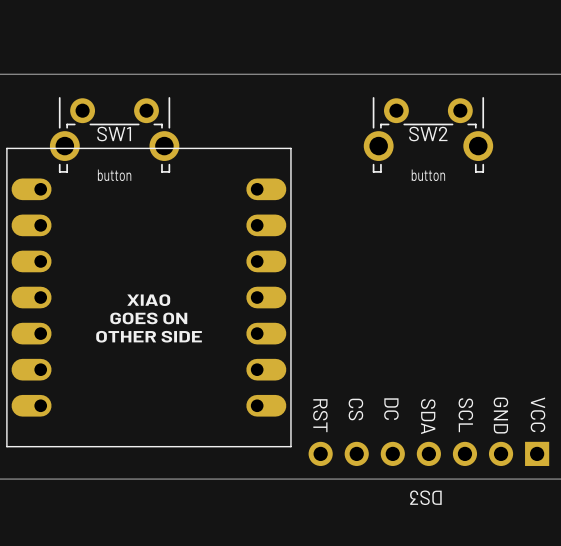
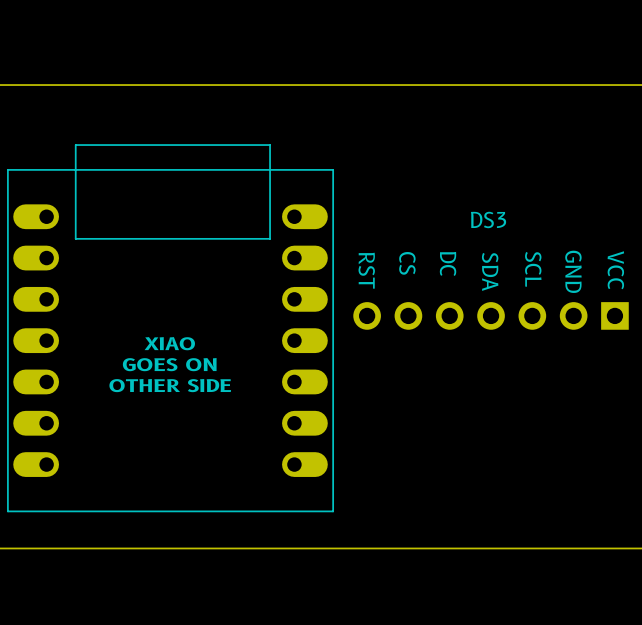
line: none -> (75, 145) (270, 145) (270, 238) (75, 238) (75, 145)
SW1: (114, 134) -> none
SW2: (428, 134) -> none
text: button (114, 175) -> none
text: button (428, 175) -> none
DS3 position: (428, 453) -> (491, 315)
DS3 name rotation: 0° (425, 497) -> 180° (488, 219)
DS3 name position: DS3 (425, 497) -> DS3 (488, 219)

